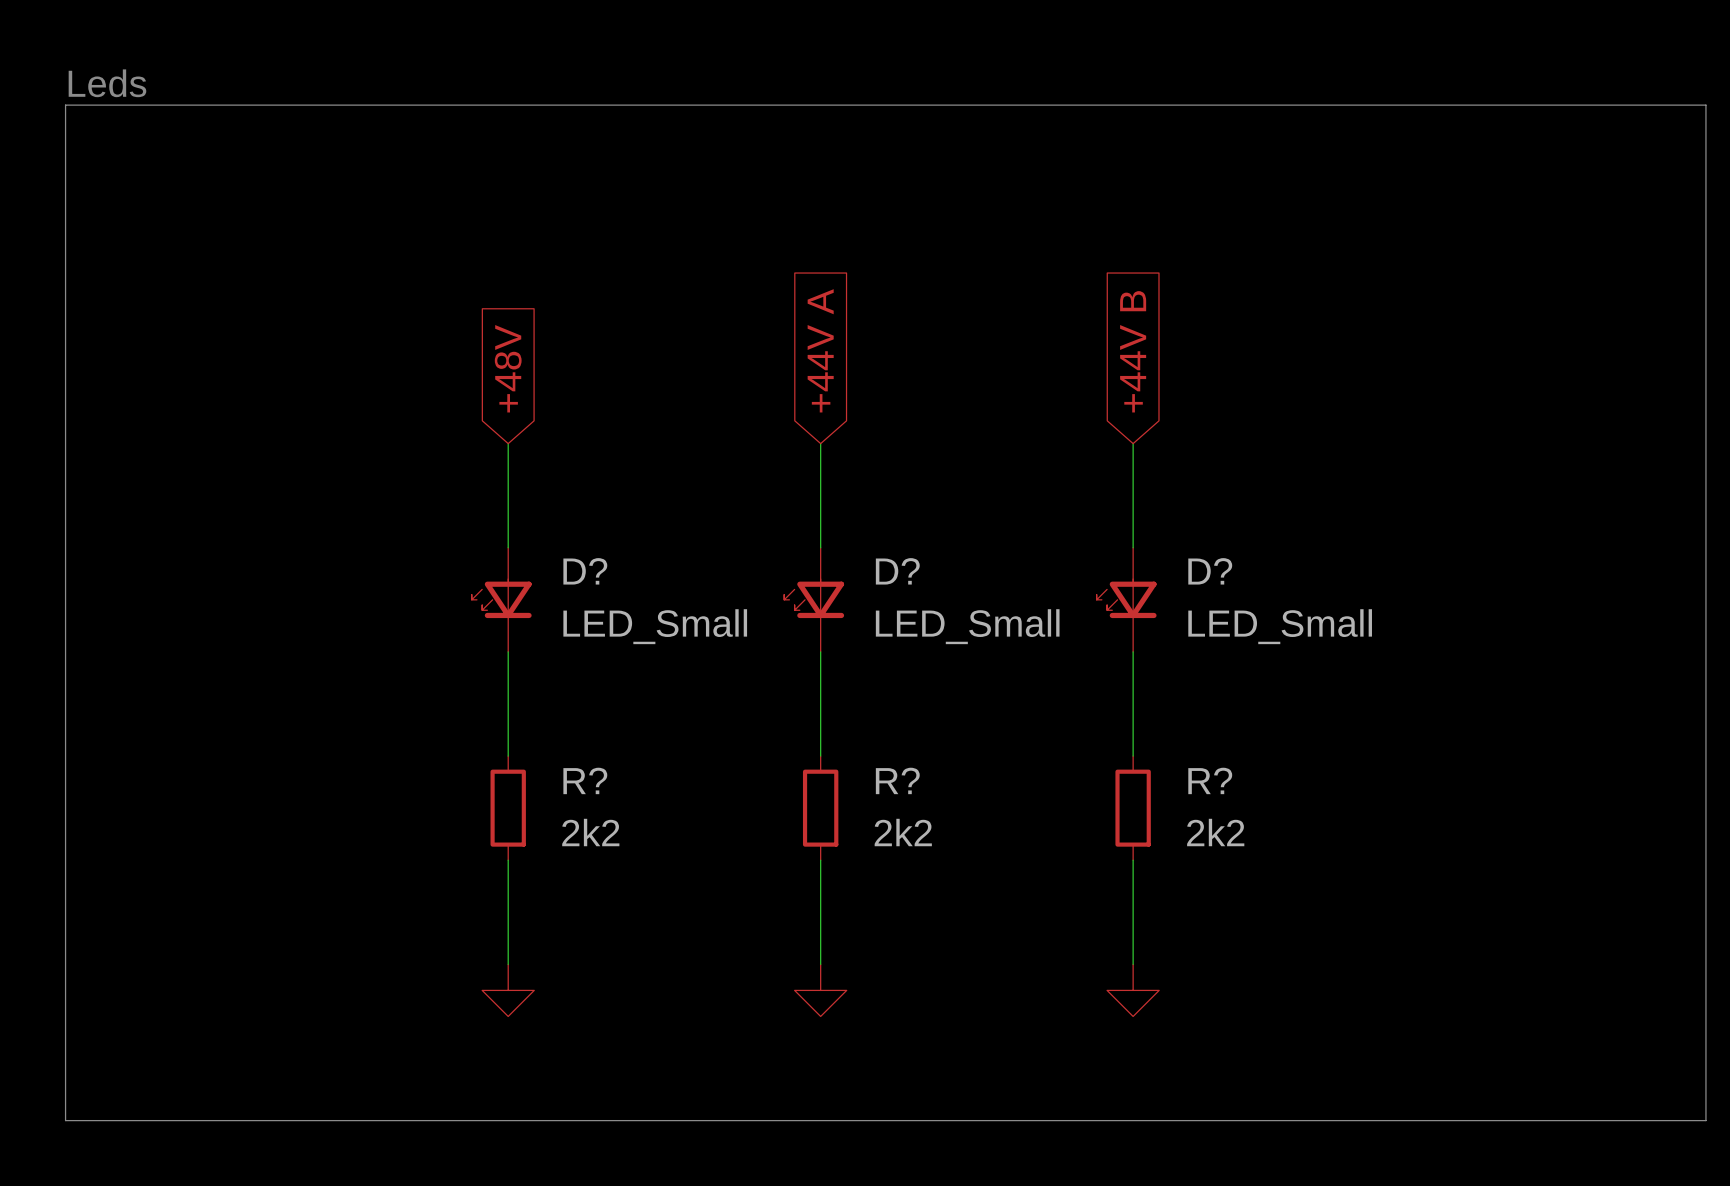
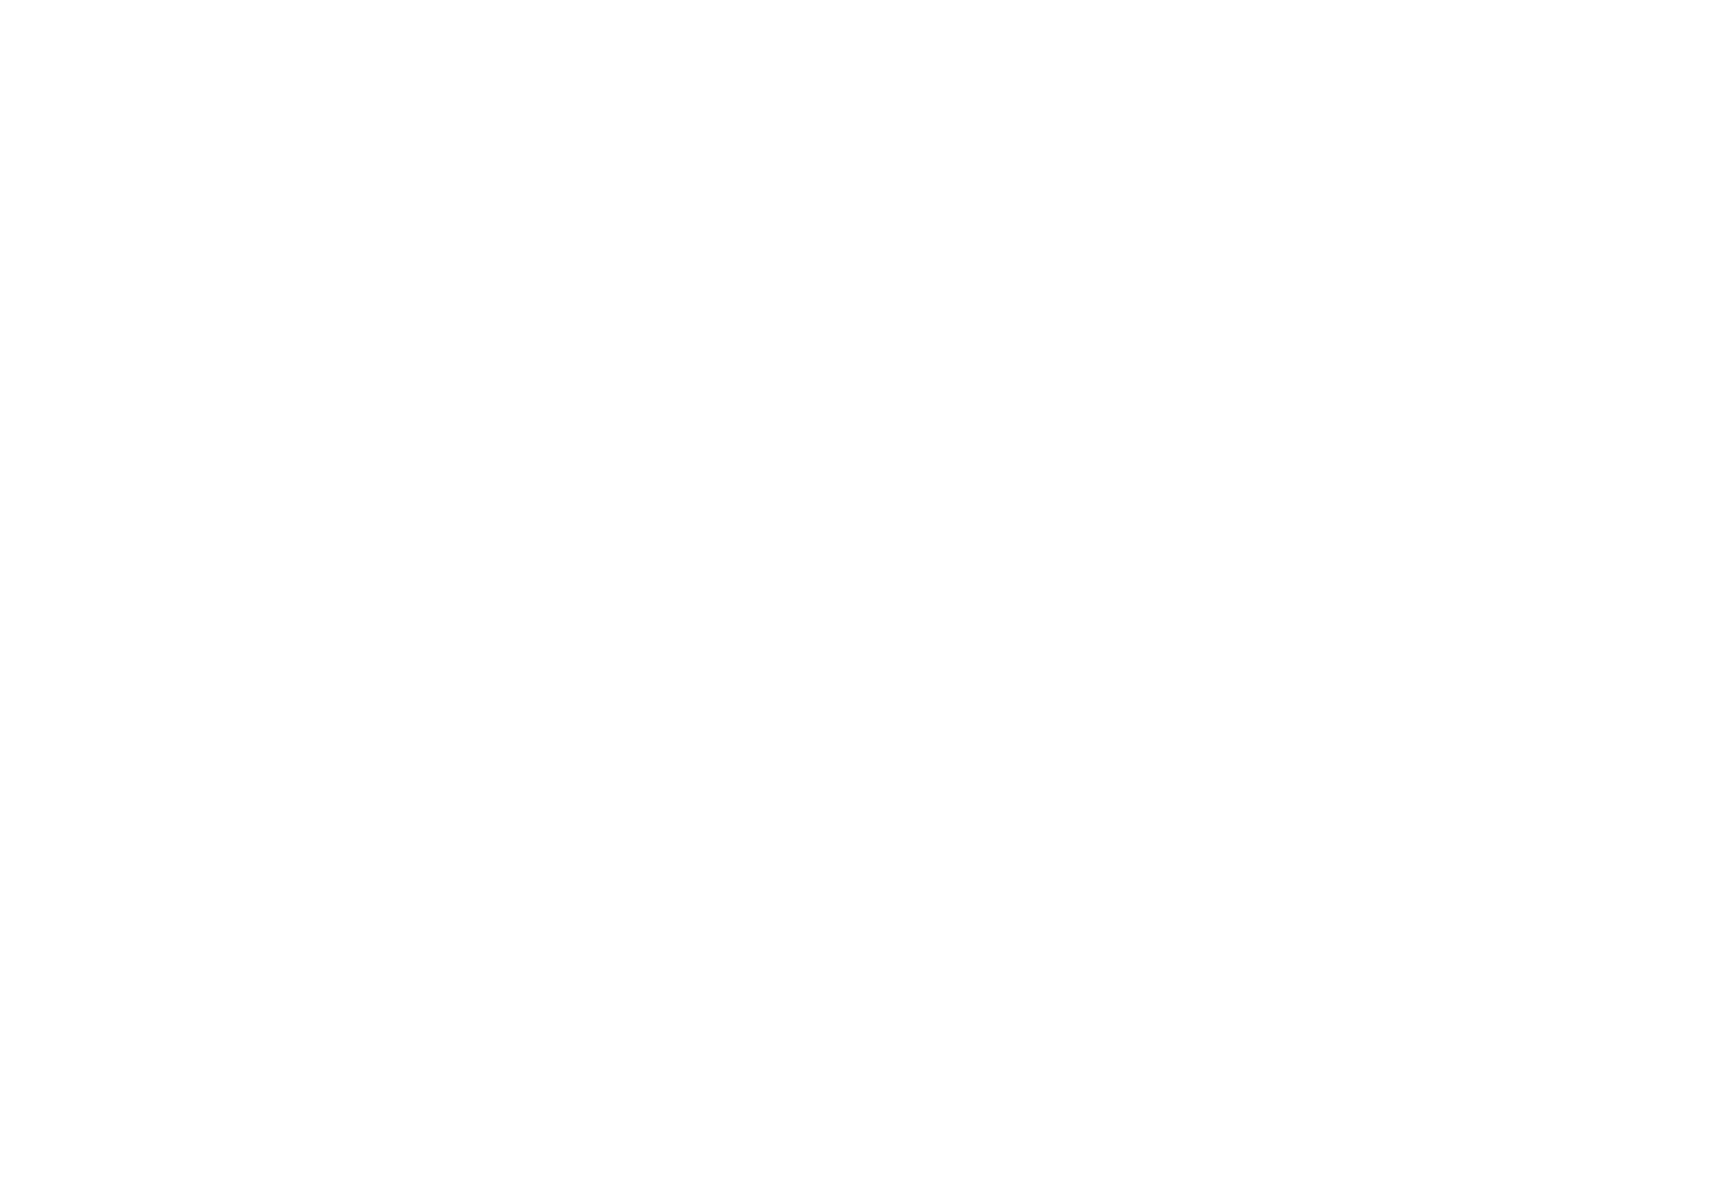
text: Leds (107, 83) -> none
line: (65, 105) (65, 1120) (1705, 1120) (1705, 105) (65, 105) -> none
global label: +44V A (820, 350) -> none
global label: +44V B (1133, 351) -> none
global label: +48V (508, 368) -> none
wire: (508, 443) (508, 547) -> none
wire: (820, 443) (820, 547) -> none
wire: (1133, 443) (1133, 547) -> none
D?: LED_Small (501, 599) -> none
D?: LED_Small (814, 599) -> none
D?: LED_Small (1126, 599) -> none
wire: (508, 651) (508, 756) -> none
wire: (820, 651) (820, 756) -> none
wire: (1133, 651) (1133, 756) -> none
R?: 2k2 (508, 808) -> none
R?: 2k2 (820, 808) -> none
R?: 2k2 (1133, 808) -> none
wire: (508, 860) (508, 964) -> none
wire: (820, 860) (820, 964) -> none
wire: (1133, 860) (1133, 964) -> none
power symbol: (508, 990) -> none
power symbol: (820, 990) -> none
power symbol: (1133, 990) -> none

